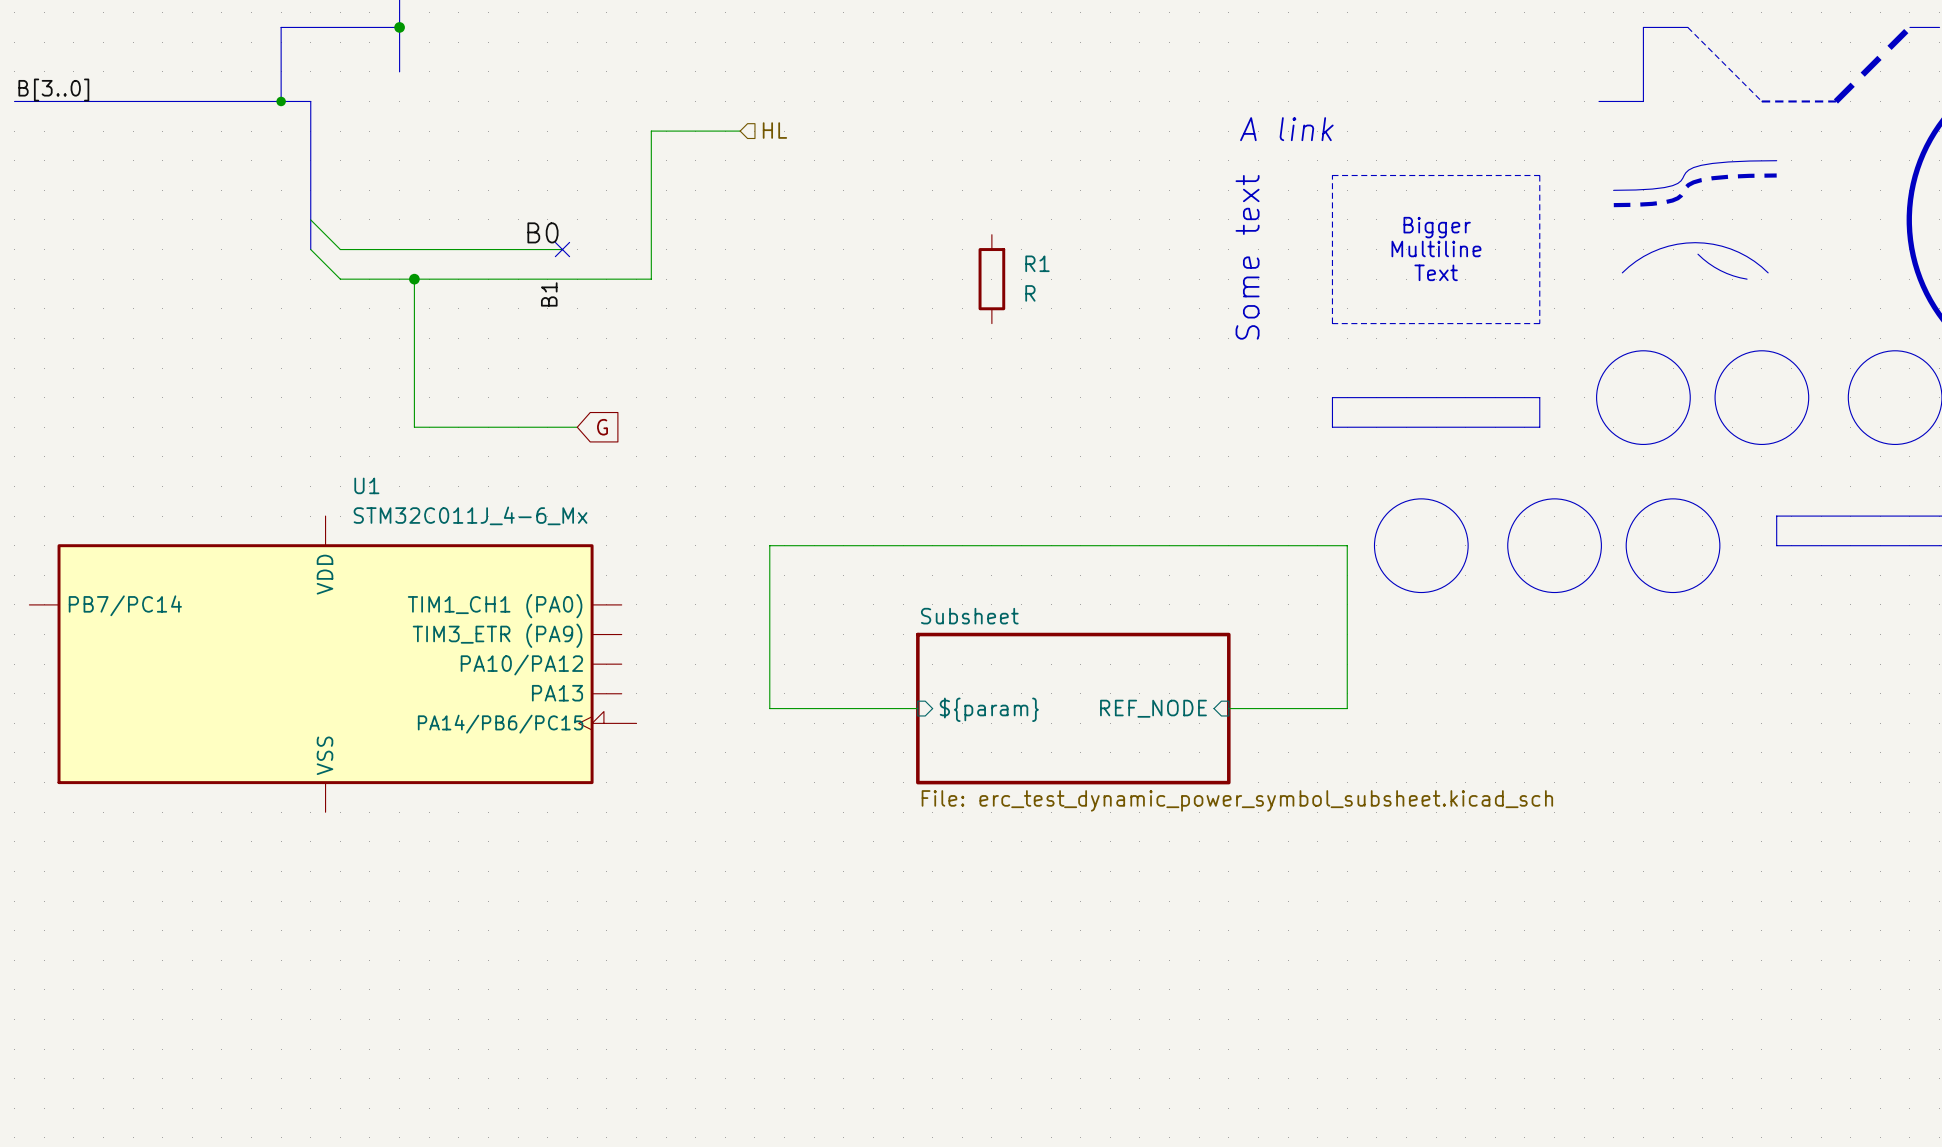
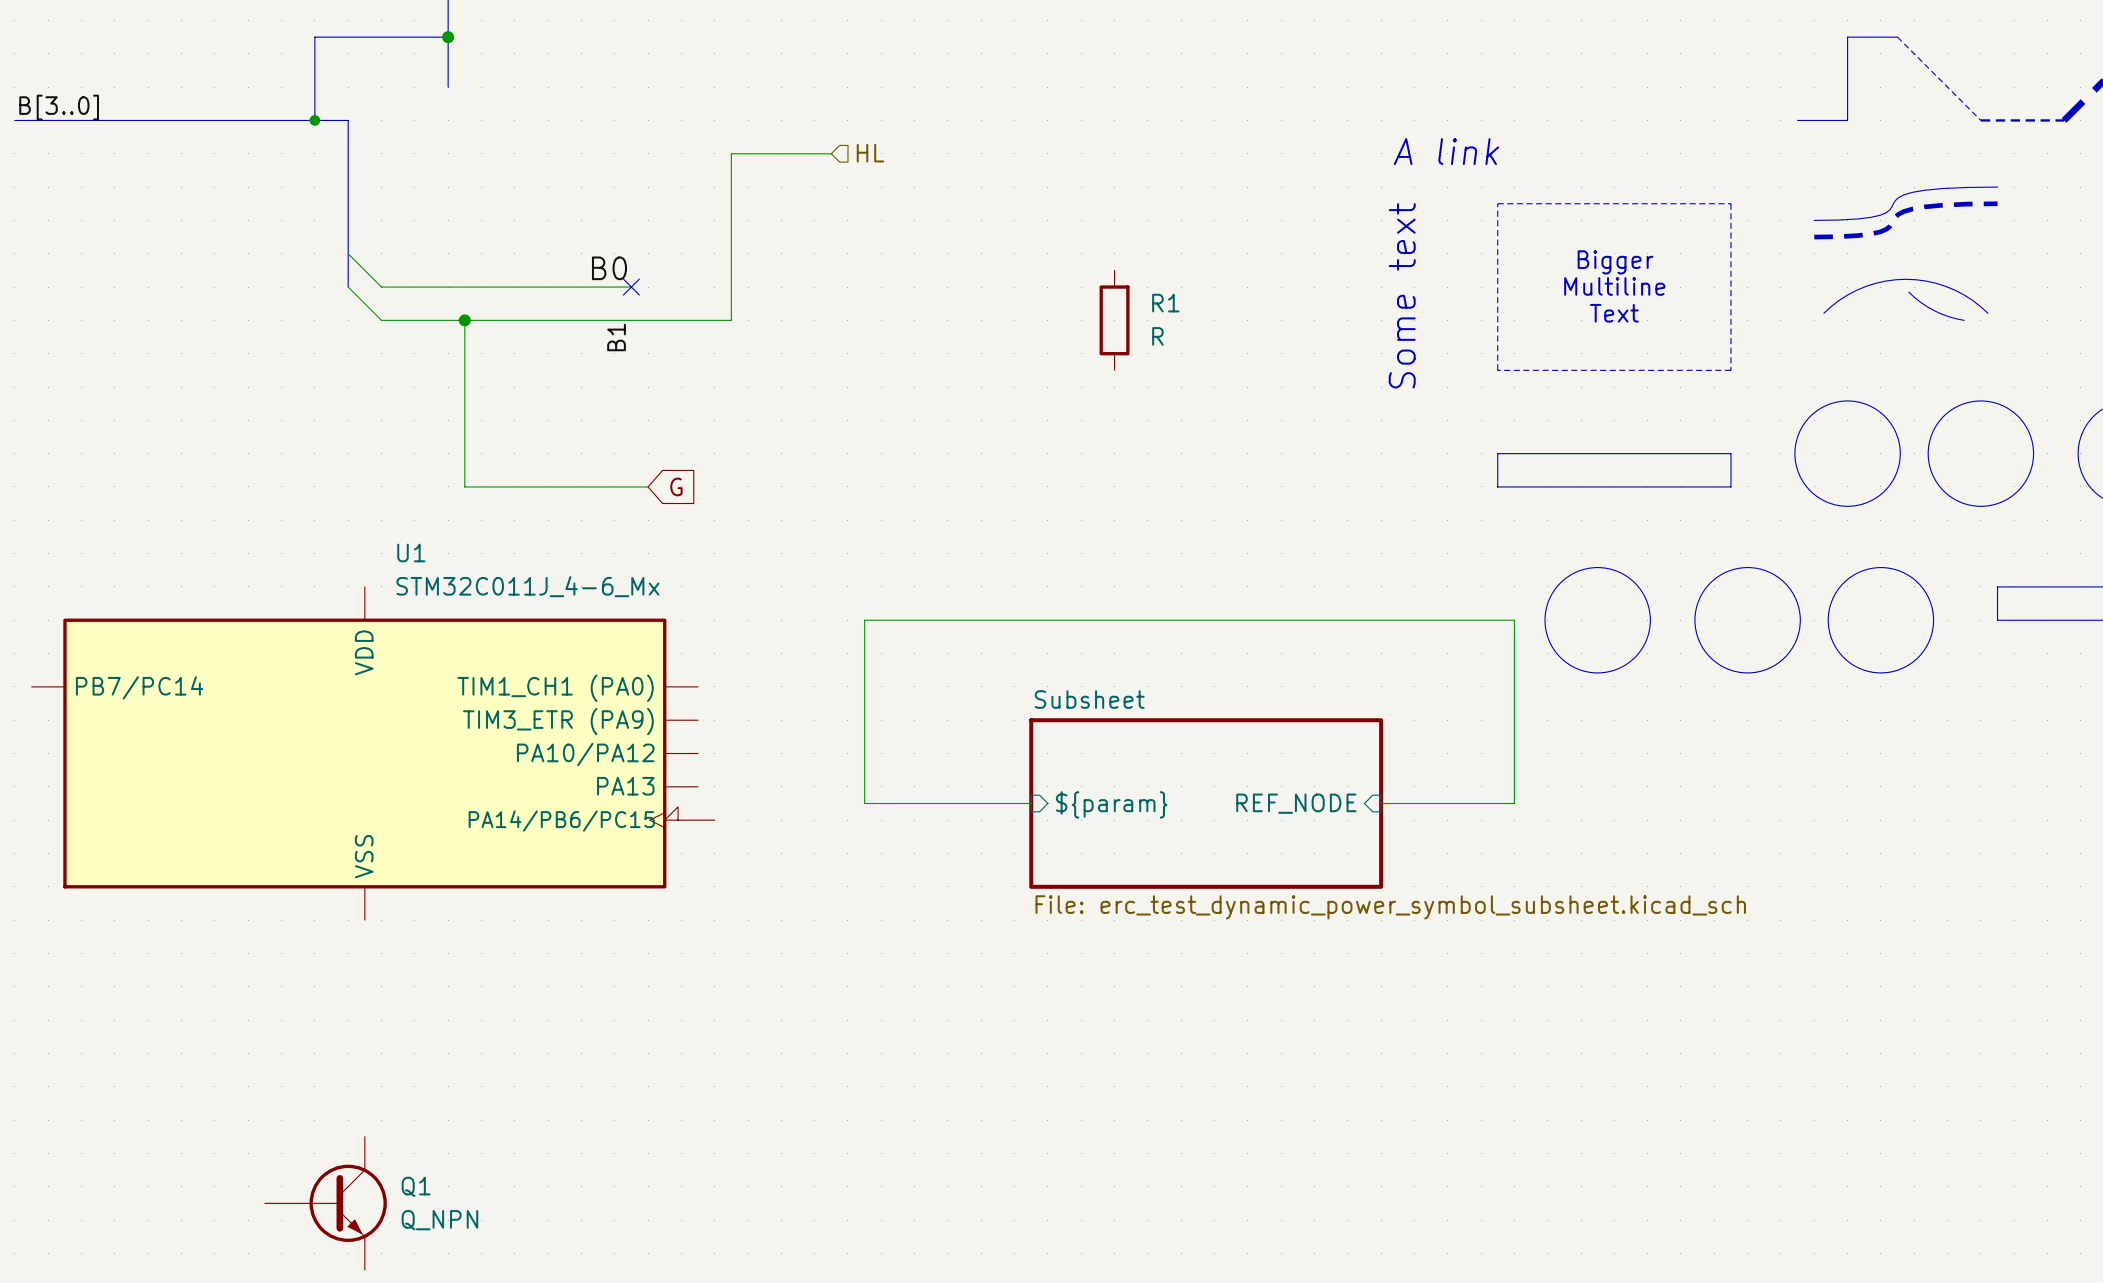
Q1: none -> Q_NPN (325, 1203)

